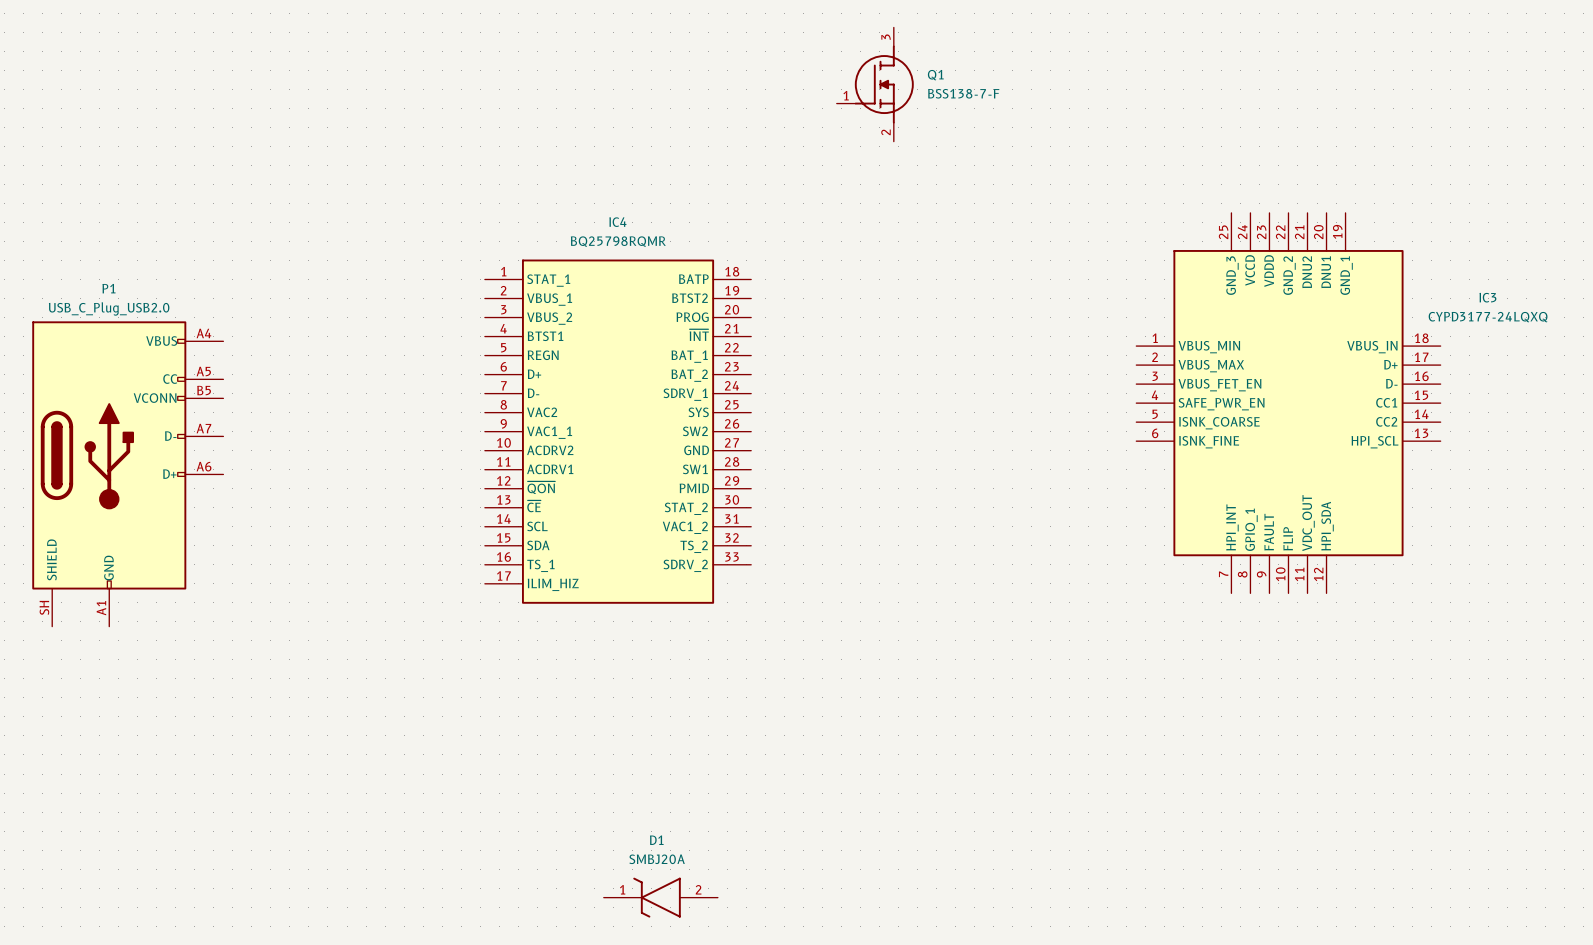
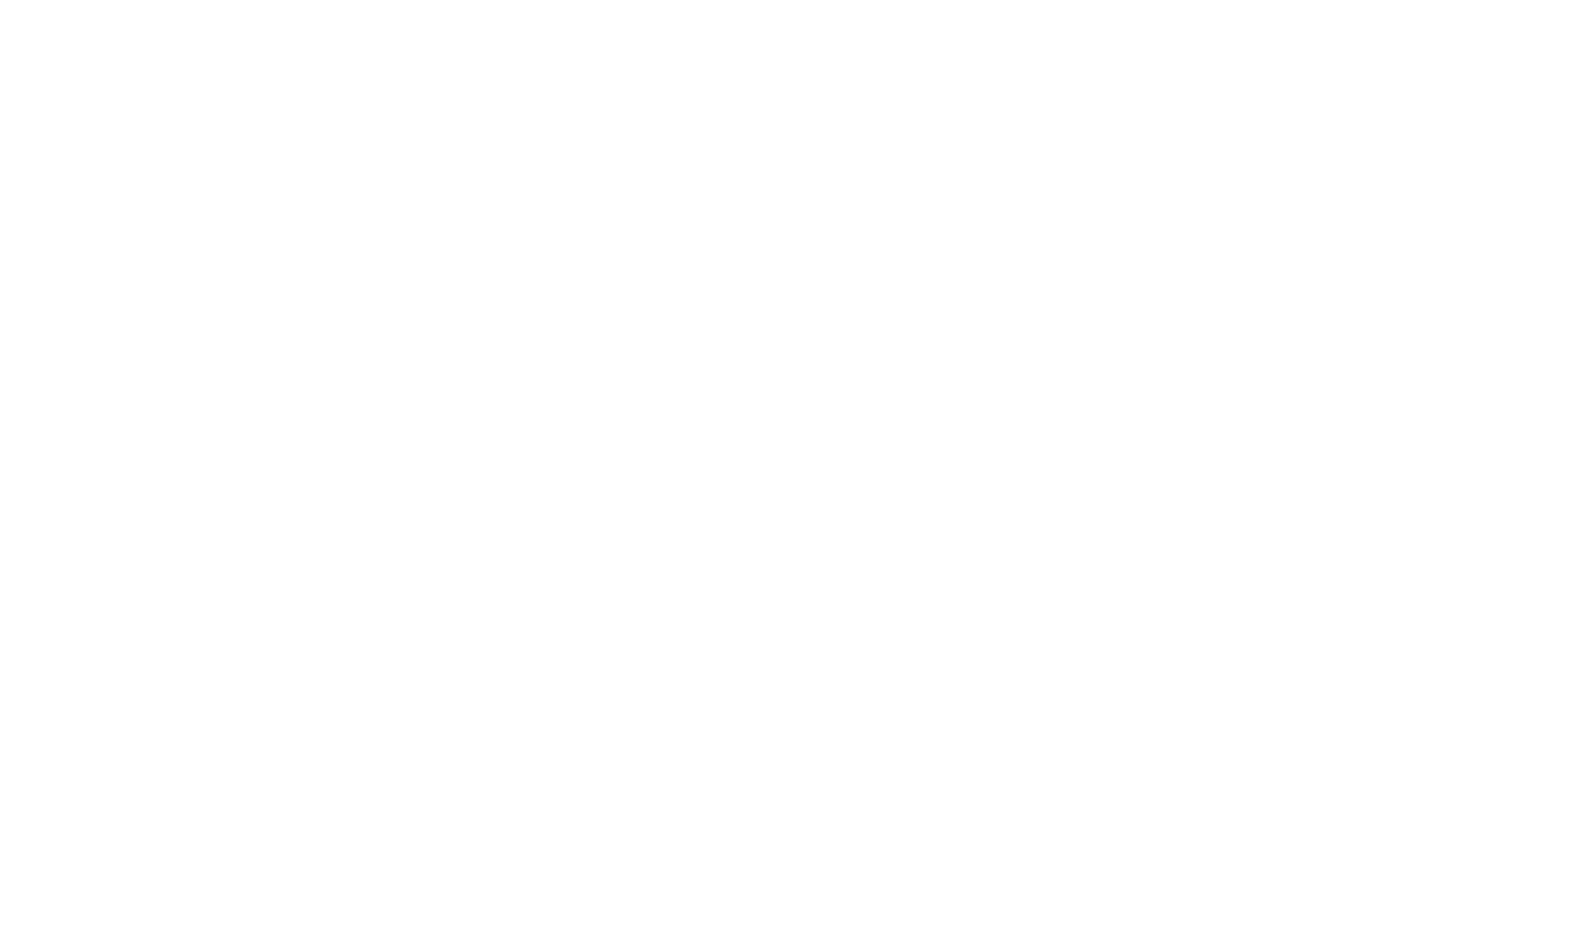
Q1: BSS138-7-F (875, 84) -> none
IC3: CYPD3177-24LQXQ (1288, 403) -> none
IC4: BQ25798RQMR (618, 431) -> none
P1: USB_C_Plug_USB2.0 (127, 473) -> none
D1: SMBJ20A (660, 897) -> none

